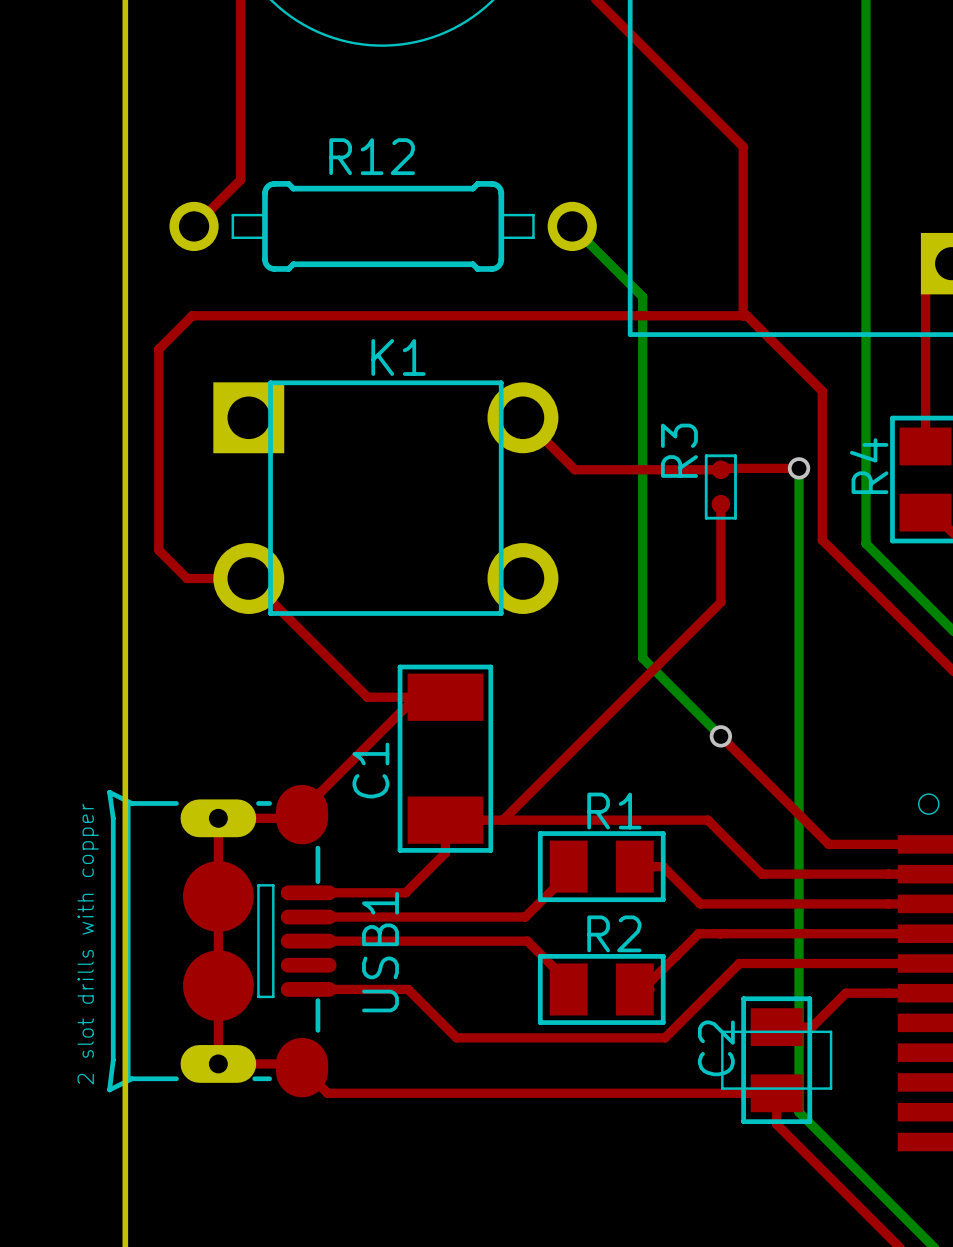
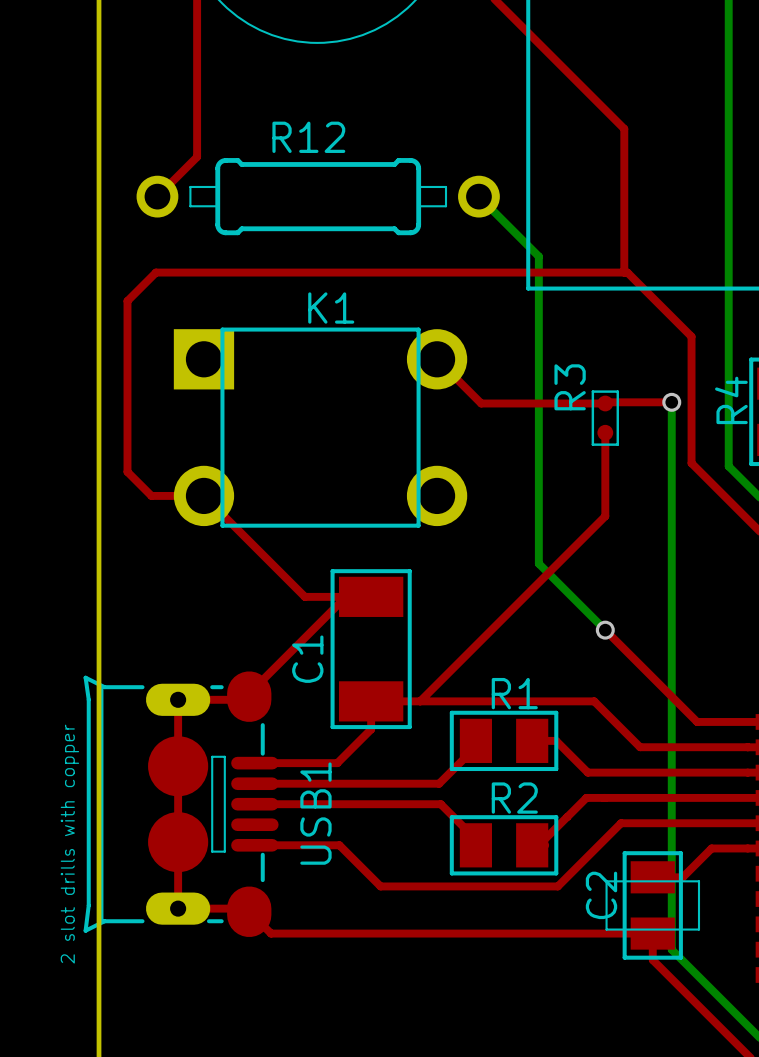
USB1 text position: 2 slot drills with copper (88, 944) -> 2 slot drills with copper (69, 844)

